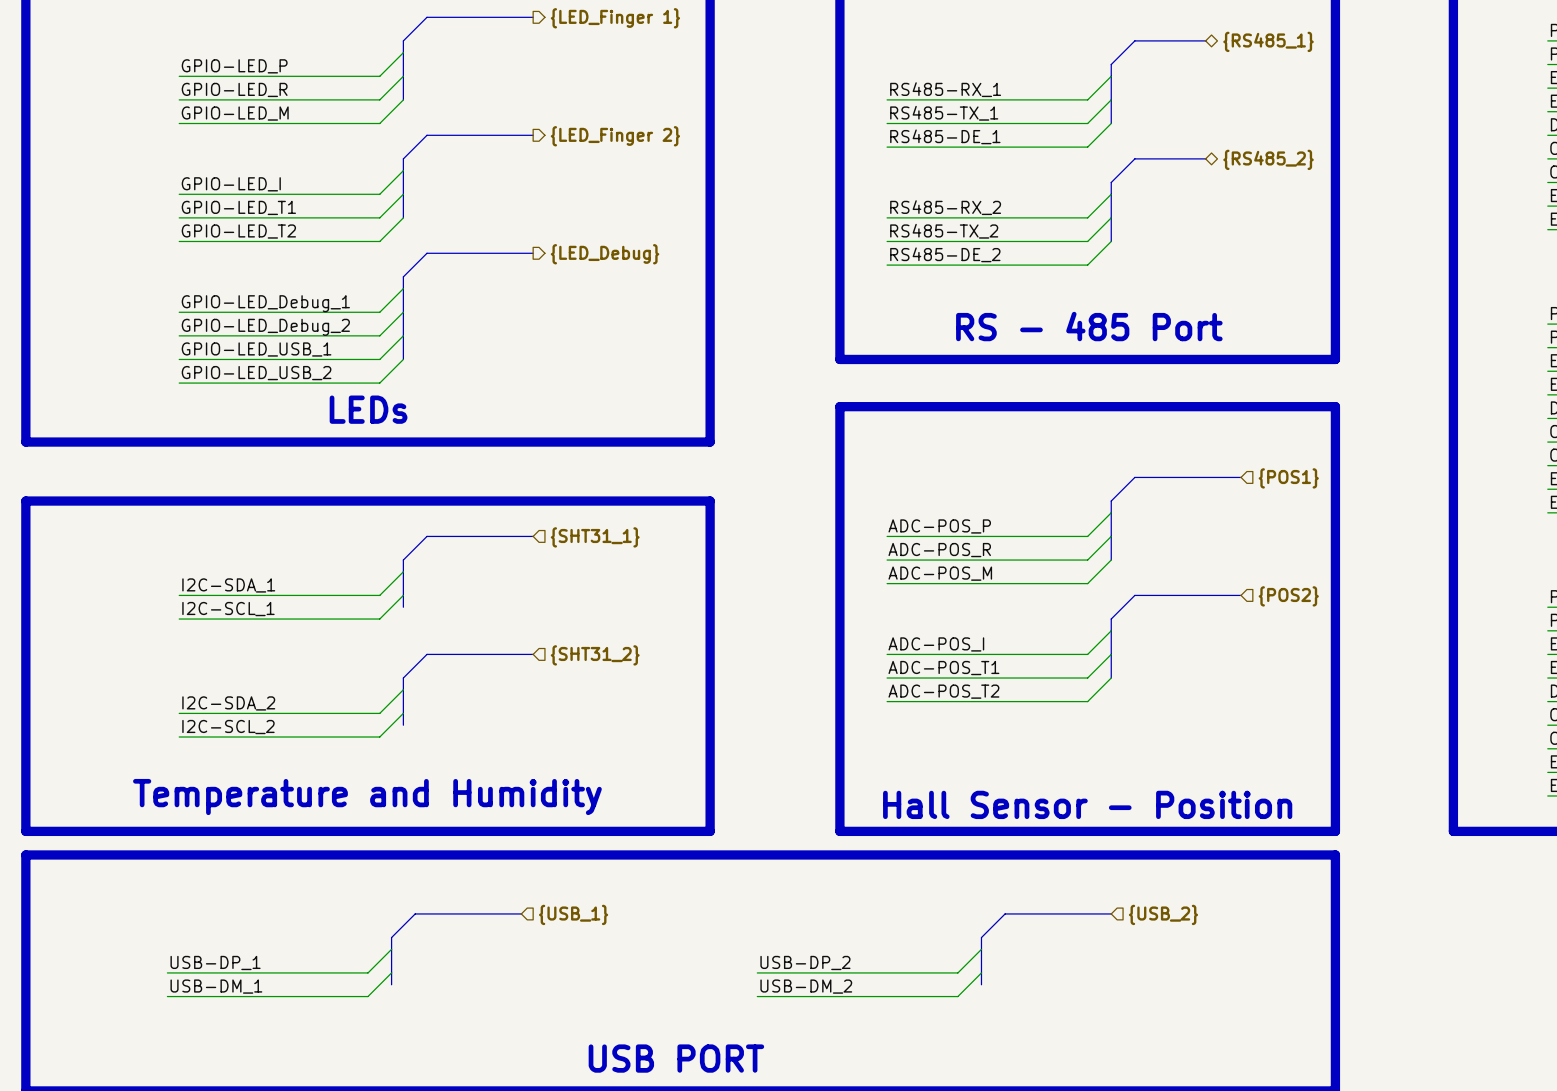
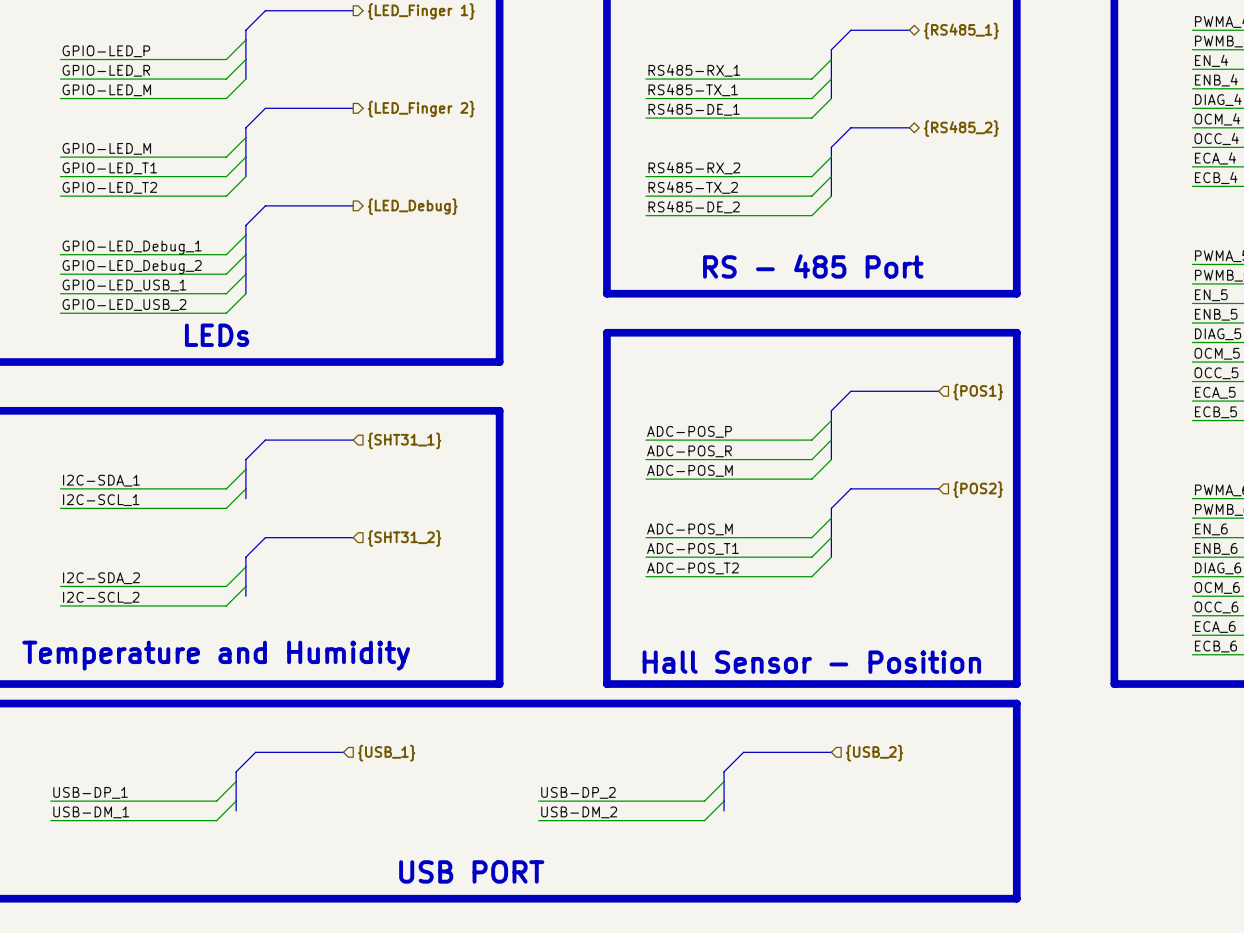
label: GPIO-LED_I (231, 184) -> GPIO-LED_M (106, 148)
label: ADC-POS_I (936, 644) -> ADC-POS_M (689, 529)

